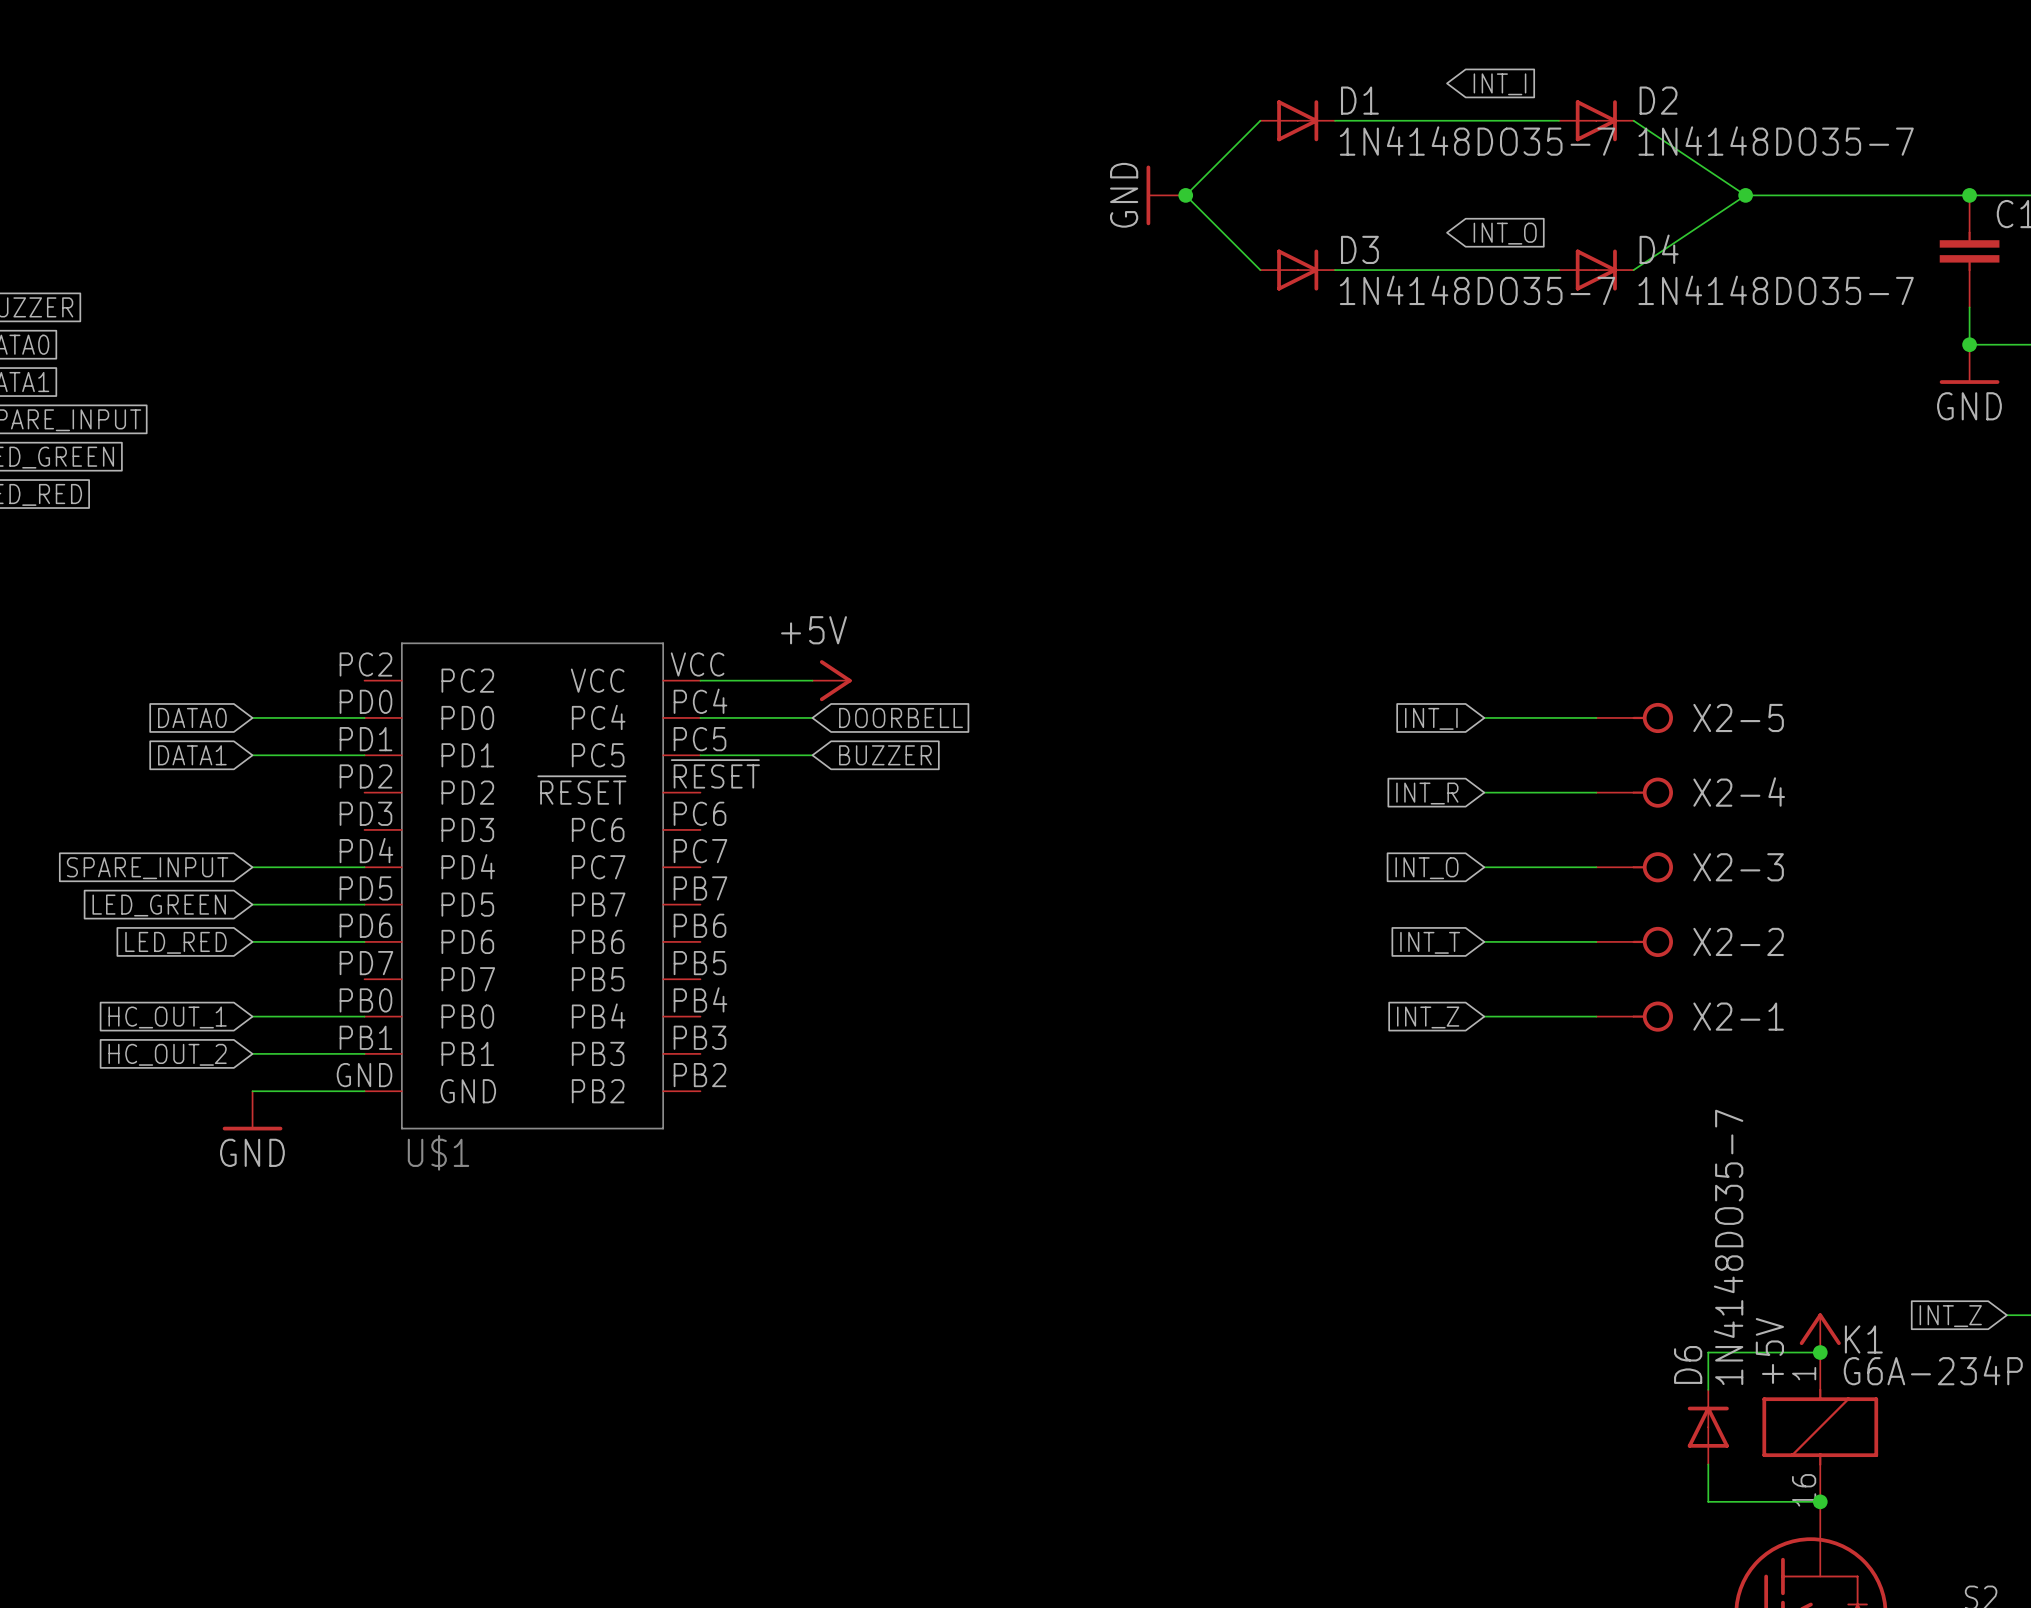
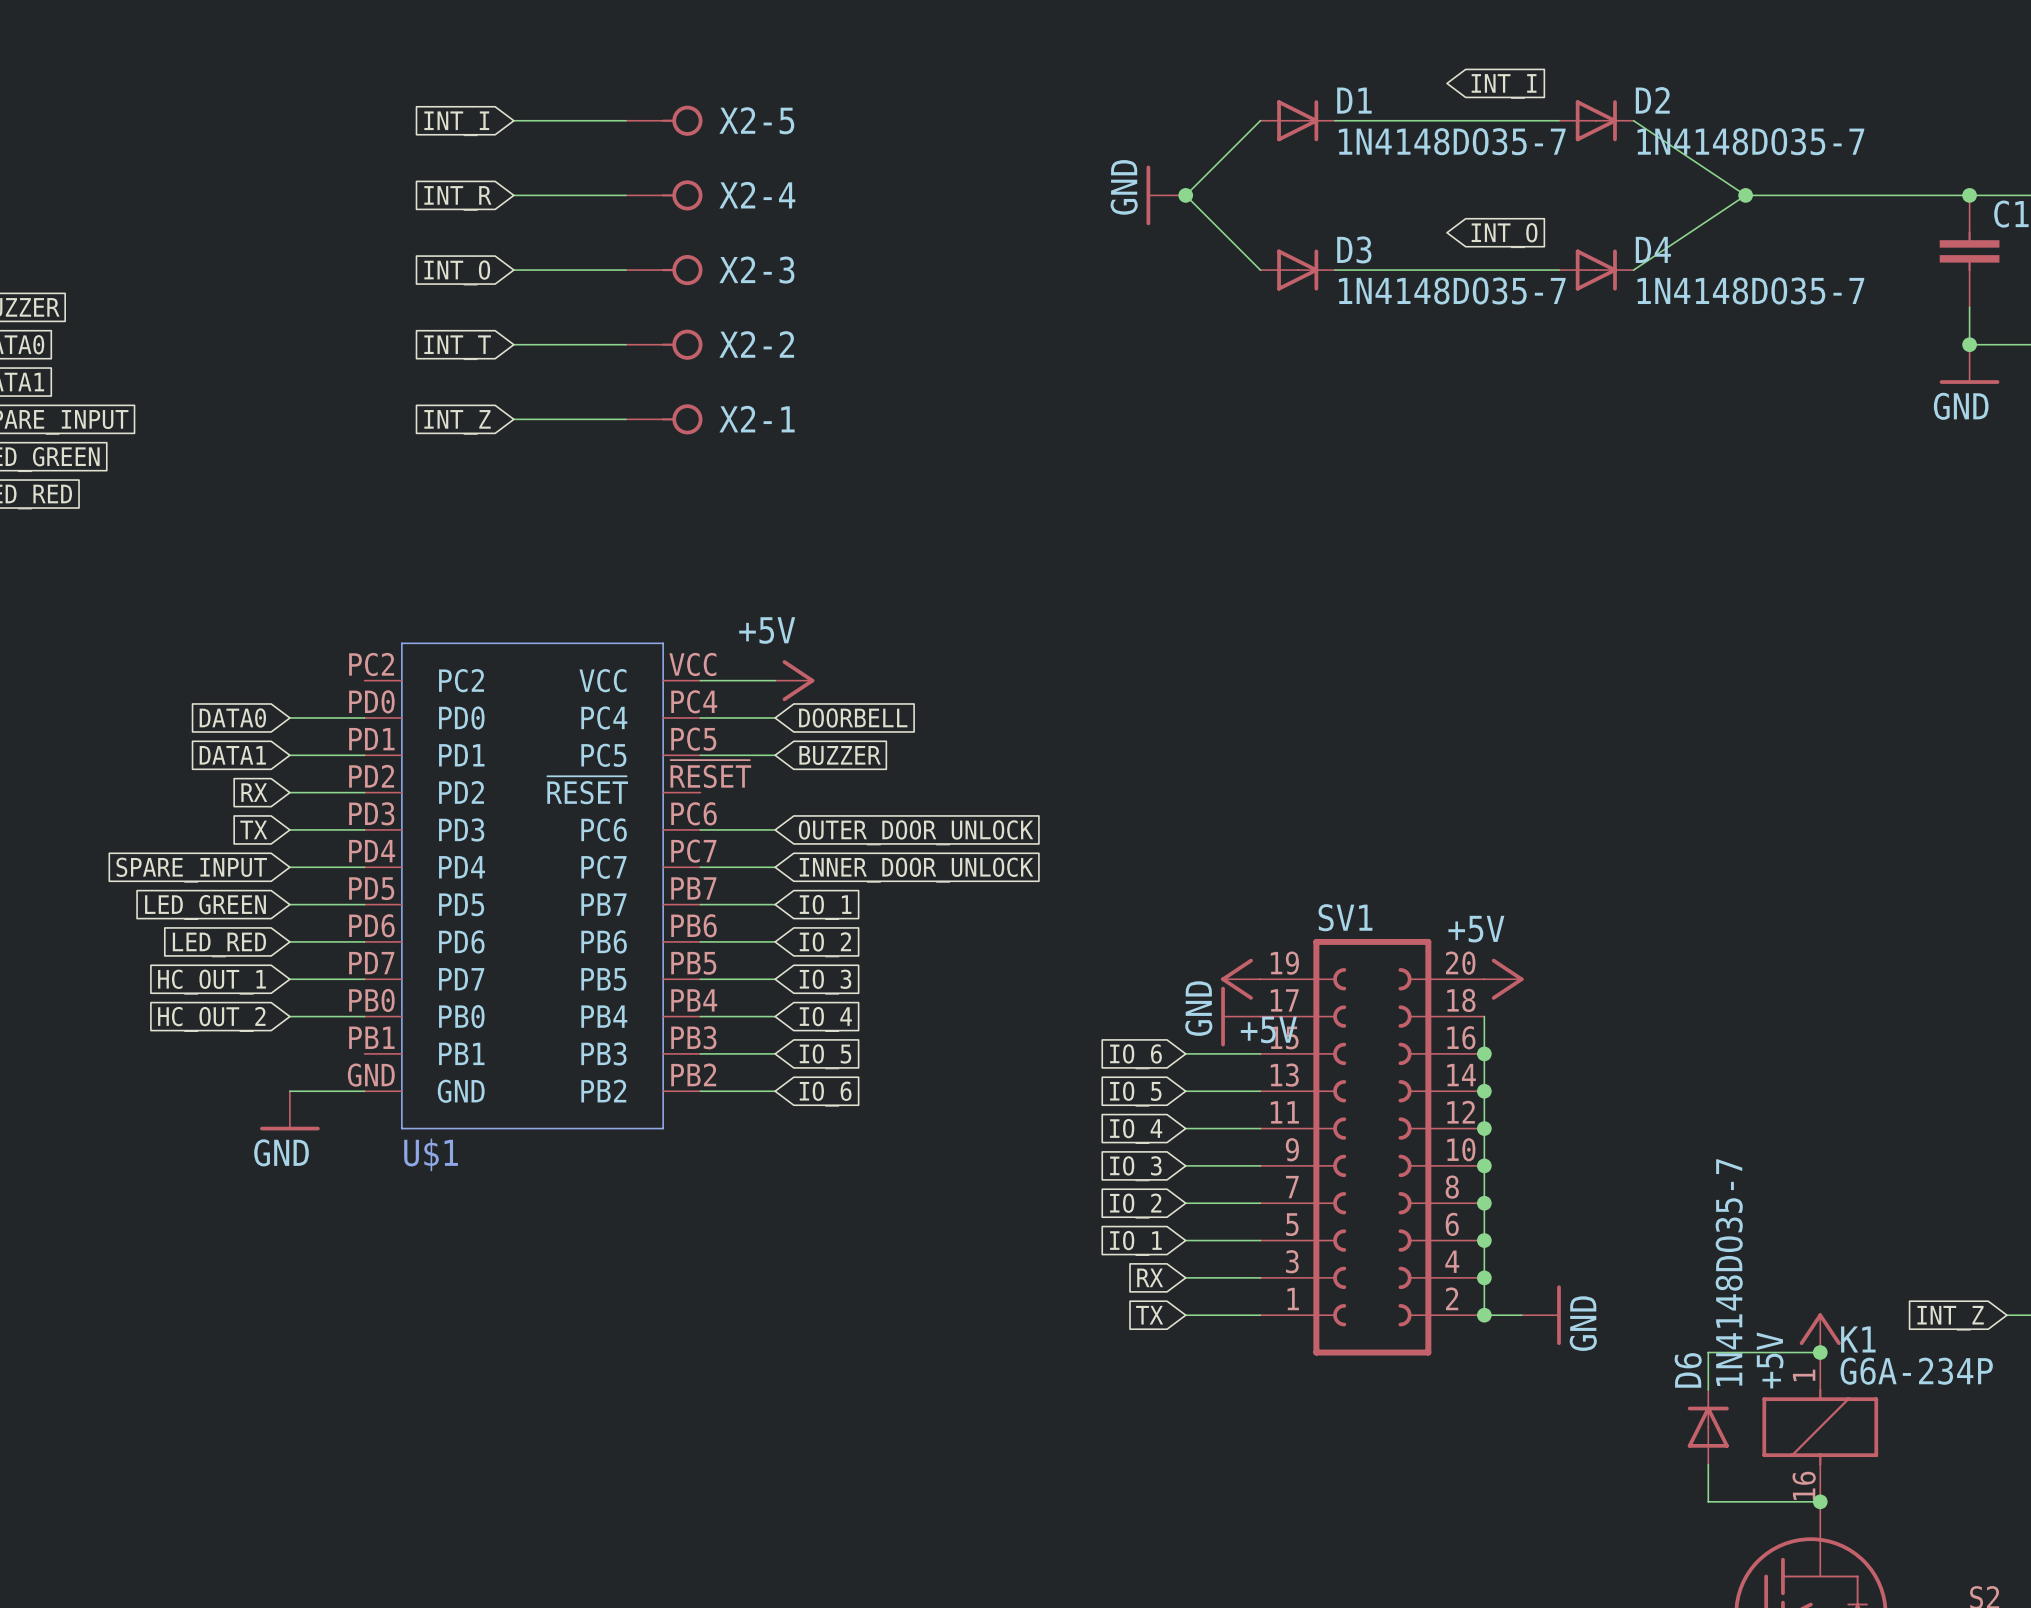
wire: none -> (513, 120) (625, 120)
global label: none -> INT_I (456, 123)
wire: none -> (513, 195) (625, 195)
global label: none -> INT_R (457, 198)
global label: none -> INT_O (457, 272)
wire: none -> (513, 270) (625, 270)
wire: none -> (513, 344) (625, 344)
global label: none -> INT_T (457, 347)
wire: none -> (513, 419) (625, 419)
global label: none -> INT_Z (457, 422)
power symbol position: +5V (832, 680) -> +5V (794, 680)
global label position: DATA0 (192, 717) -> DATA0 (232, 717)
wire: (252, 717) (289, 717) -> none
wire: (775, 717) (812, 717) -> none
global label position: DOORBELL (901, 717) -> DOORBELL (853, 717)
wire: (1484, 717) (1596, 717) -> none
X2-5 position: (1634, 717) -> (664, 120)
global label: INT_I (1431, 718) -> none
global label position: DATA1 (192, 755) -> DATA1 (232, 755)
wire: (252, 755) (289, 755) -> none
wire: (775, 755) (812, 755) -> none
global label position: BUZZER (885, 755) -> BUZZER (840, 755)
global label: none -> RX (254, 792)
wire: none -> (289, 792) (364, 792)
wire: (1484, 792) (1596, 792) -> none
X2-4 position: (1634, 792) -> (664, 195)
global label: INT_R (1427, 793) -> none
global label: none -> TX (253, 829)
wire: none -> (289, 829) (364, 829)
wire: none -> (700, 829) (775, 829)
global label: none -> OUTER_DOOR_UNLOCK (916, 832)
wire: (252, 867) (289, 867) -> none
wire: none -> (700, 867) (775, 867)
wire: (1484, 867) (1596, 867) -> none
X2-3 position: (1634, 867) -> (664, 270)
global label position: SPARE_INPUT (147, 868) -> SPARE_INPUT (191, 870)
global label: none -> INNER_DOOR_UNLOCK (916, 870)
global label: INT_O (1426, 868) -> none
wire: (252, 904) (289, 904) -> none
wire: none -> (700, 904) (775, 904)
global label position: LED_GREEN (159, 905) -> LED_GREEN (205, 907)
global label: none -> IO_1 (825, 907)
wire: (252, 941) (289, 941) -> none
wire: none -> (700, 941) (775, 941)
wire: (1484, 941) (1596, 941) -> none
X2-2 position: (1634, 941) -> (664, 344)
global label position: LED_RED (175, 942) -> LED_RED (219, 944)
global label: none -> IO_2 (825, 944)
global label: INT_T (1430, 942) -> none
wire: none -> (289, 979) (364, 979)
wire: none -> (700, 979) (775, 979)
power symbol: none -> +5V (1240, 979)
power symbol: none -> +5V (1503, 979)
global label: none -> IO_3 (825, 982)
wire: (252, 1016) (289, 1016) -> none
wire: none -> (700, 1016) (775, 1016)
power symbol: none -> GND (1240, 1016)
wire: (1484, 1016) (1596, 1016) -> (1484, 1016) (1484, 1315) (1521, 1315)
X2-1 position: (1634, 1016) -> (664, 419)
global label position: HC_OUT_1 (167, 1017) -> HC_OUT_1 (211, 982)
global label: none -> IO_4 (825, 1019)
global label: INT_Z (1428, 1017) -> none
wire: (252, 1053) (364, 1053) -> none
wire: none -> (700, 1053) (775, 1053)
wire: none -> (1185, 1053) (1260, 1053)
junction: none -> (1484, 1053)
global label position: HC_OUT_2 (167, 1054) -> HC_OUT_2 (211, 1019)
global label: none -> IO_5 (825, 1056)
global label: none -> IO_6 (1135, 1056)
wire: (252, 1091) (289, 1091) -> none
wire: none -> (700, 1091) (775, 1091)
wire: none -> (1185, 1091) (1260, 1091)
junction: none -> (1484, 1091)
global label: none -> IO_6 (825, 1094)
global label: none -> IO_5 (1135, 1094)
power symbol position: GND (252, 1110) -> GND (289, 1110)
wire: none -> (1185, 1128) (1260, 1128)
junction: none -> (1484, 1128)
global label: none -> IO_4 (1136, 1131)
SV1: none -> (1372, 1147)
wire: none -> (1185, 1165) (1260, 1165)
junction: none -> (1484, 1165)
global label: none -> IO_3 (1135, 1168)
wire: none -> (1185, 1203) (1260, 1203)
junction: none -> (1484, 1203)
global label: none -> IO_2 (1135, 1206)
wire: none -> (1185, 1240) (1260, 1240)
junction: none -> (1484, 1240)
global label: none -> IO_1 (1135, 1243)
global label: none -> RX (1150, 1277)
wire: none -> (1185, 1277) (1260, 1277)
junction: none -> (1484, 1277)
global label: none -> TX (1149, 1315)
wire: none -> (1185, 1315) (1260, 1315)
junction: none -> (1484, 1315)
power symbol: none -> GND (1541, 1315)

